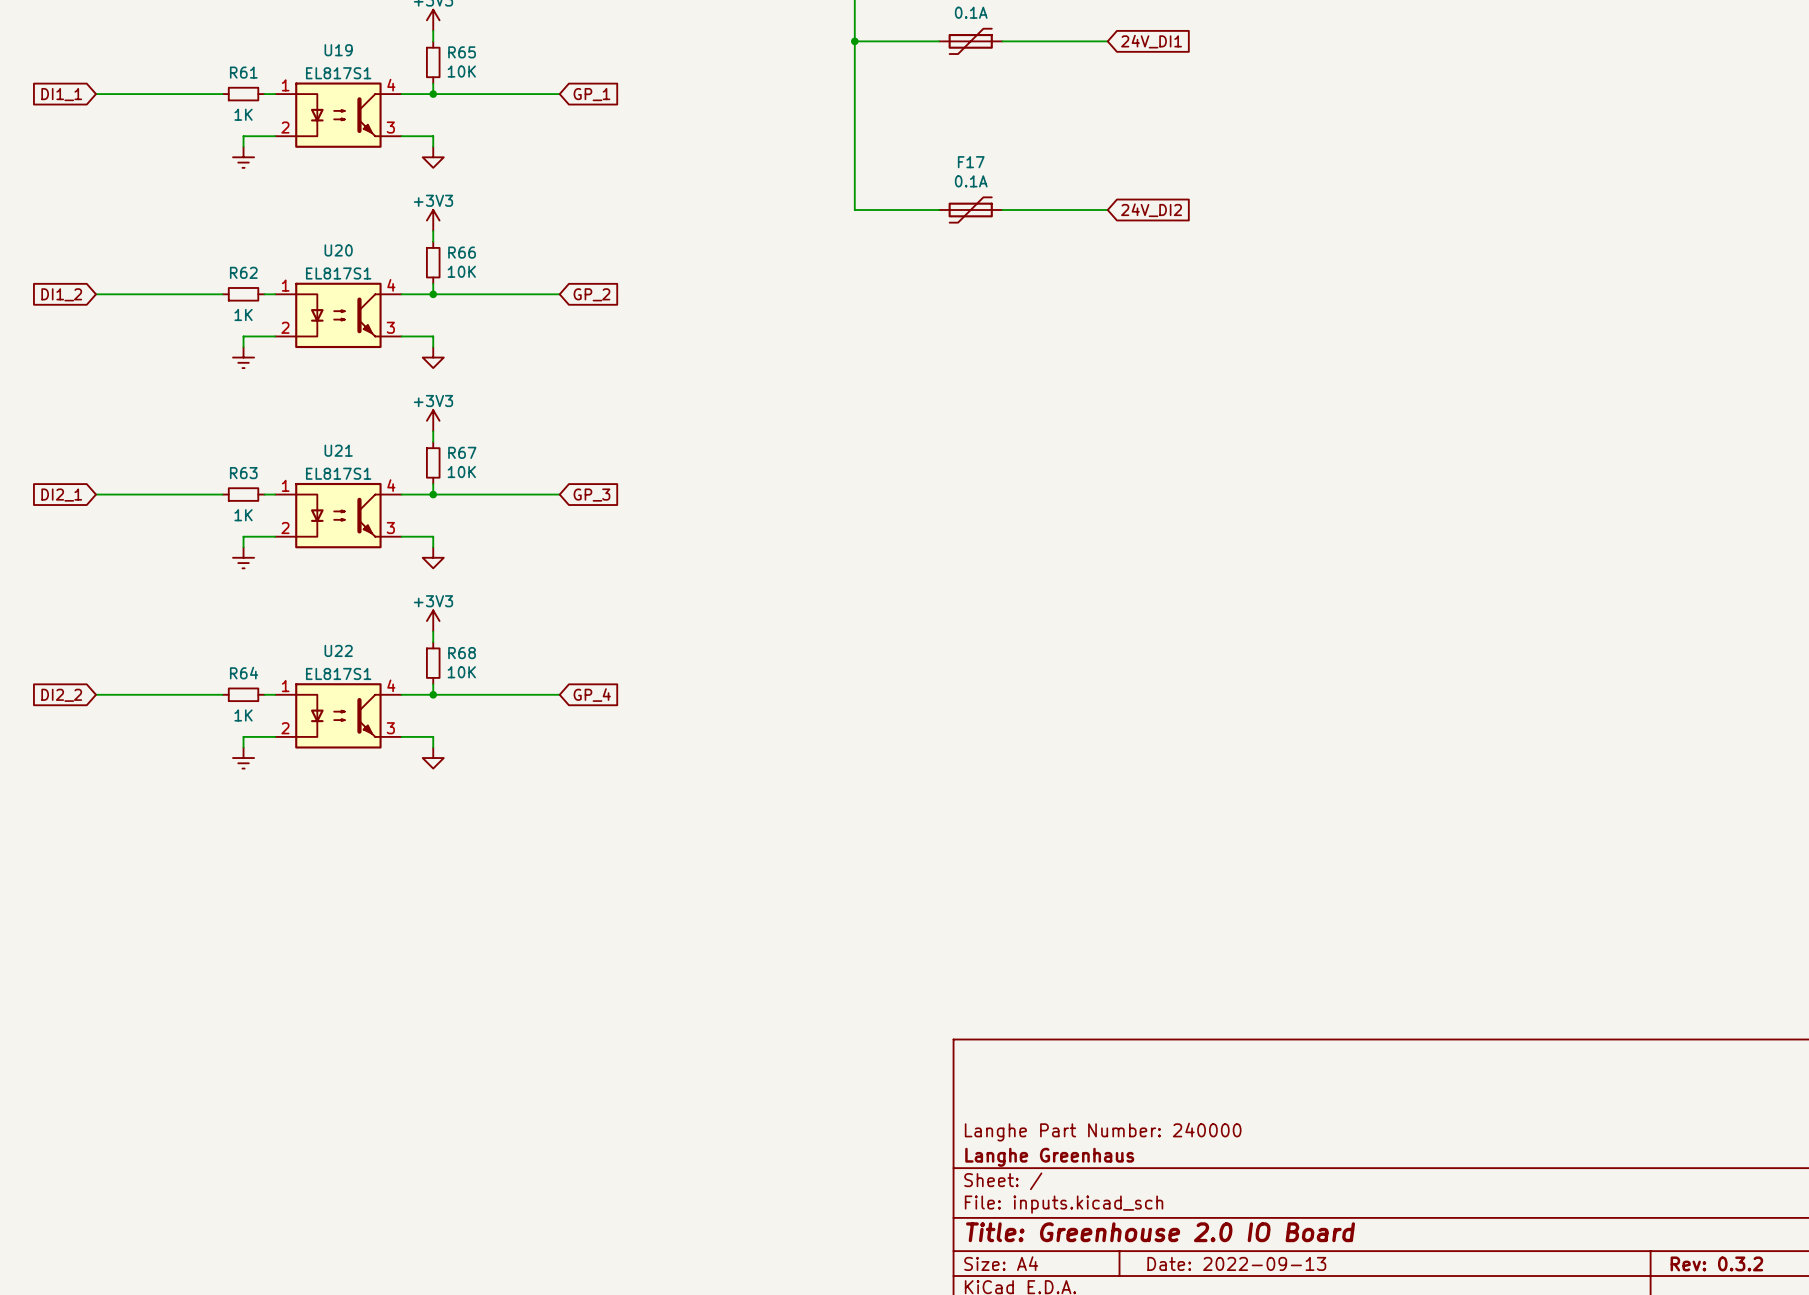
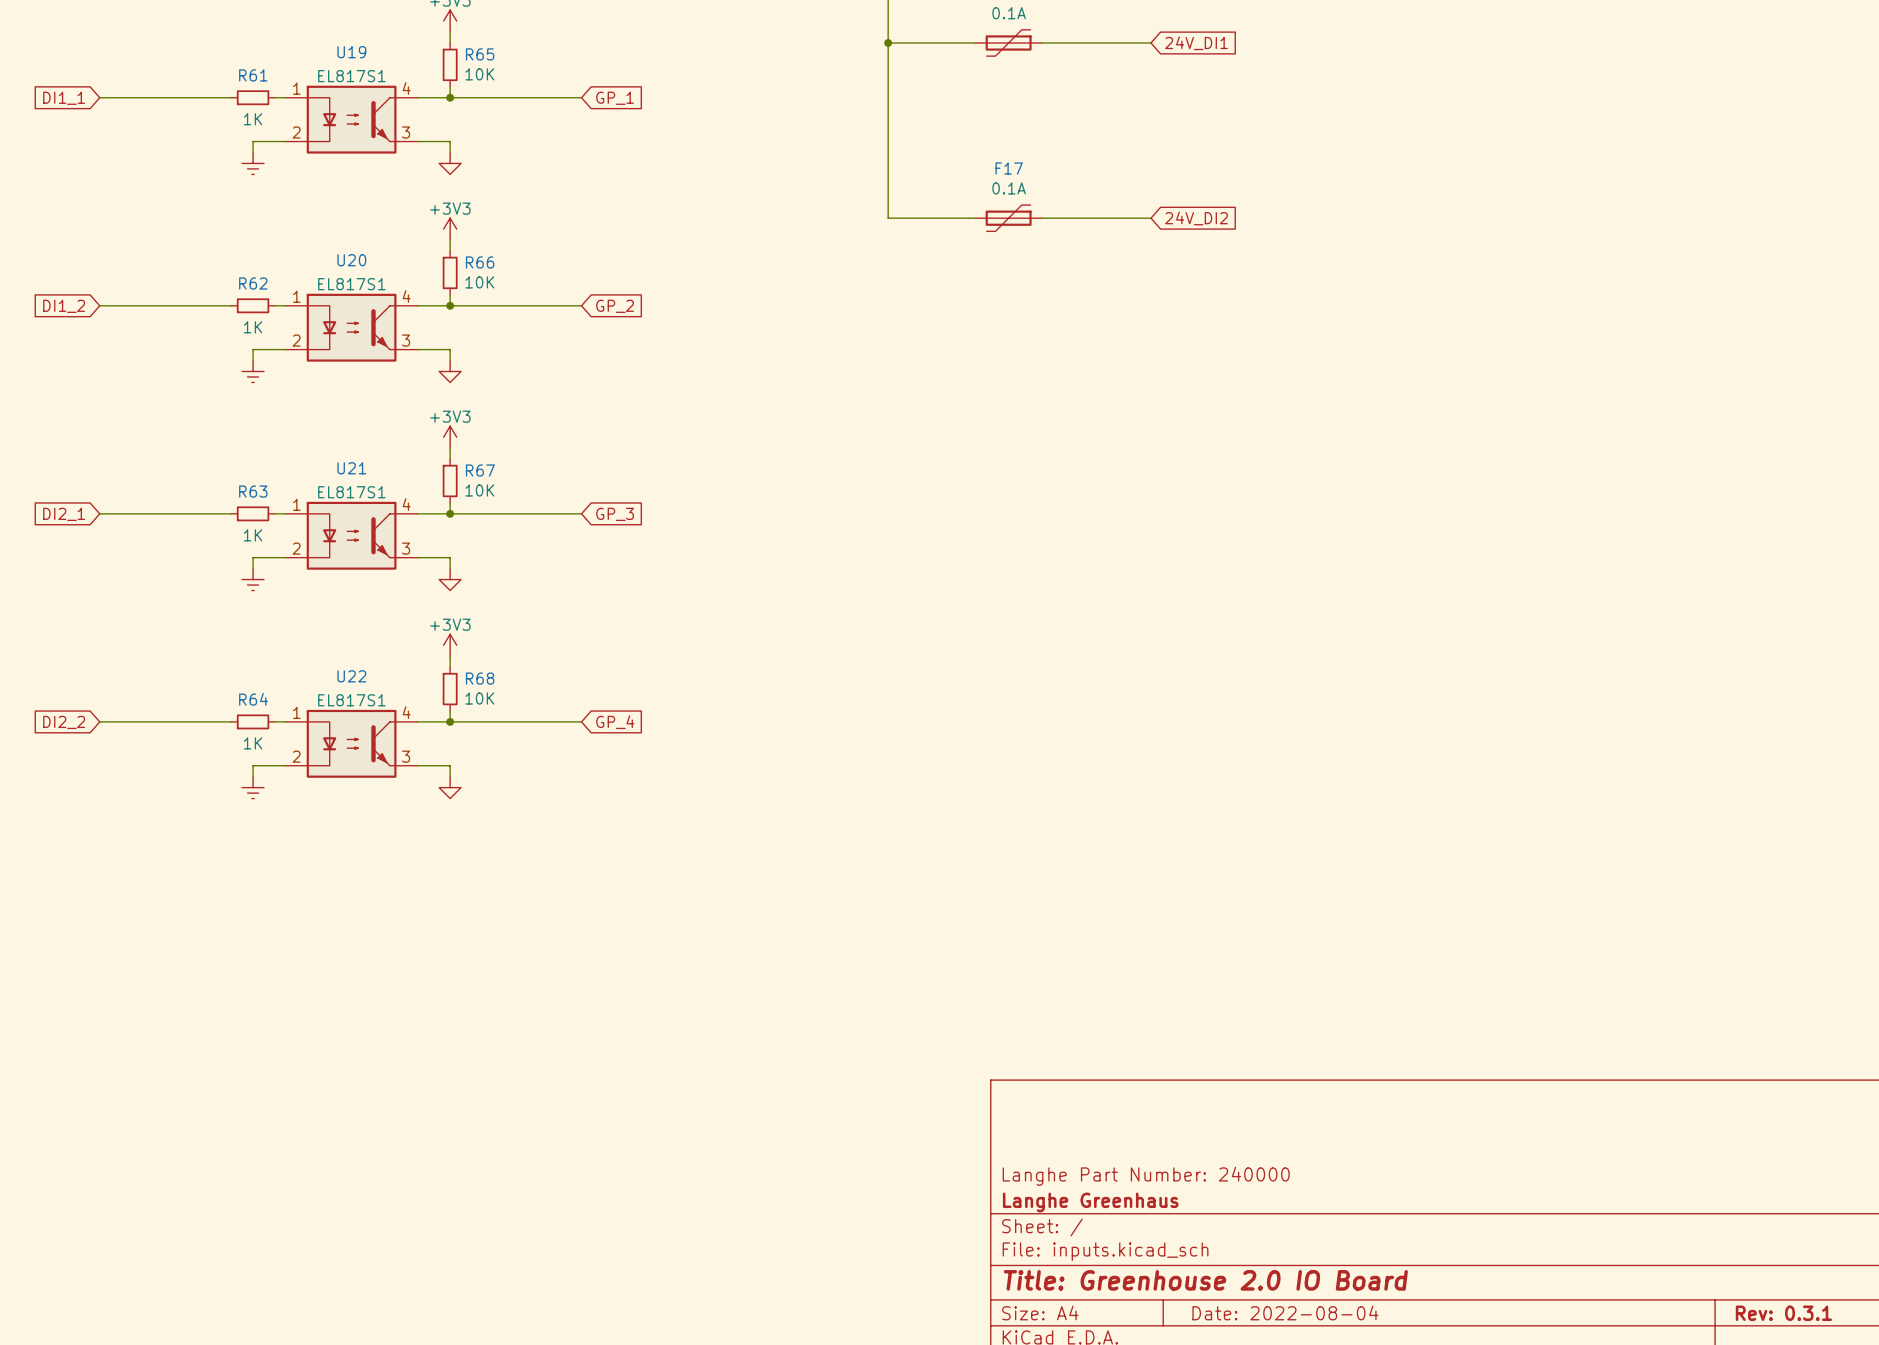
title block: Date: 2022-09-13 (1236, 1263) -> Date: 2022-08-04 (1285, 1312)
title block: Rev: 0.3.2 (1716, 1263) -> Rev: 0.3.1 (1783, 1313)

